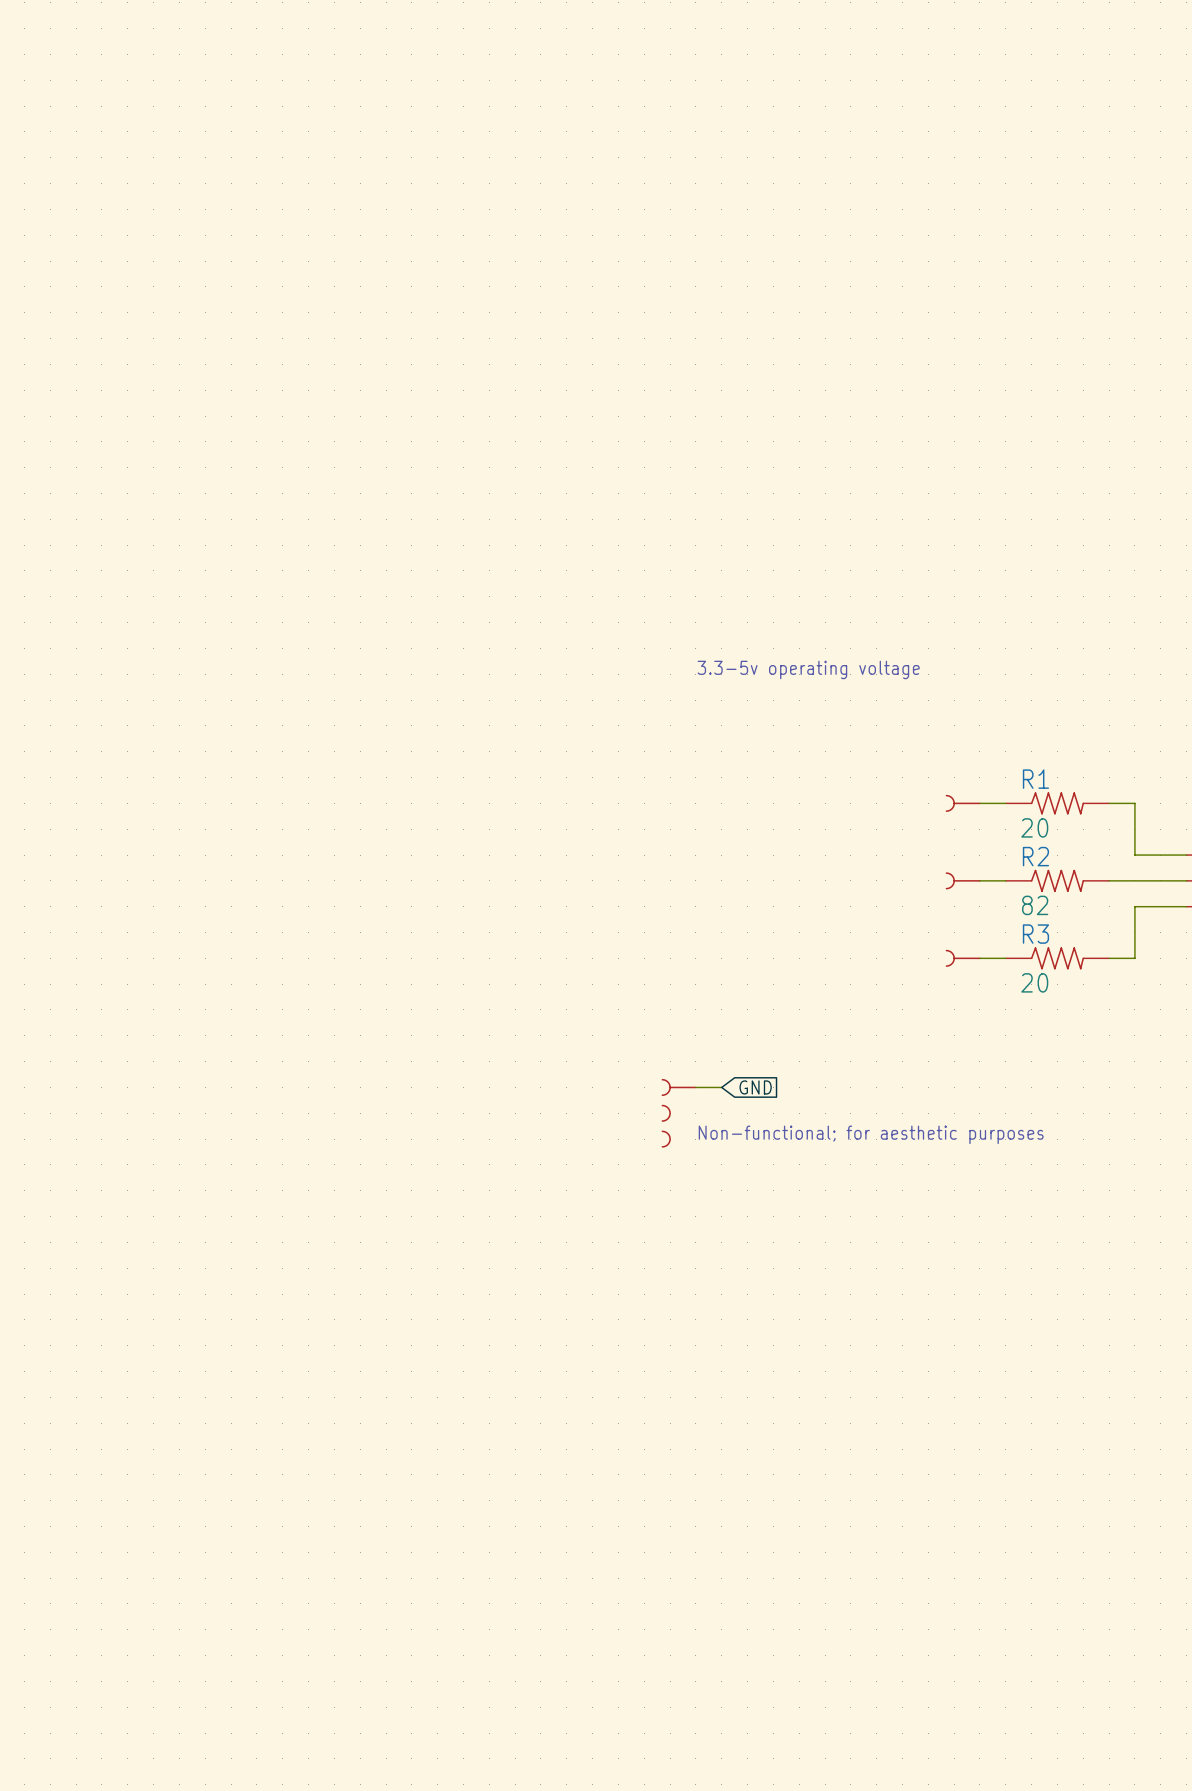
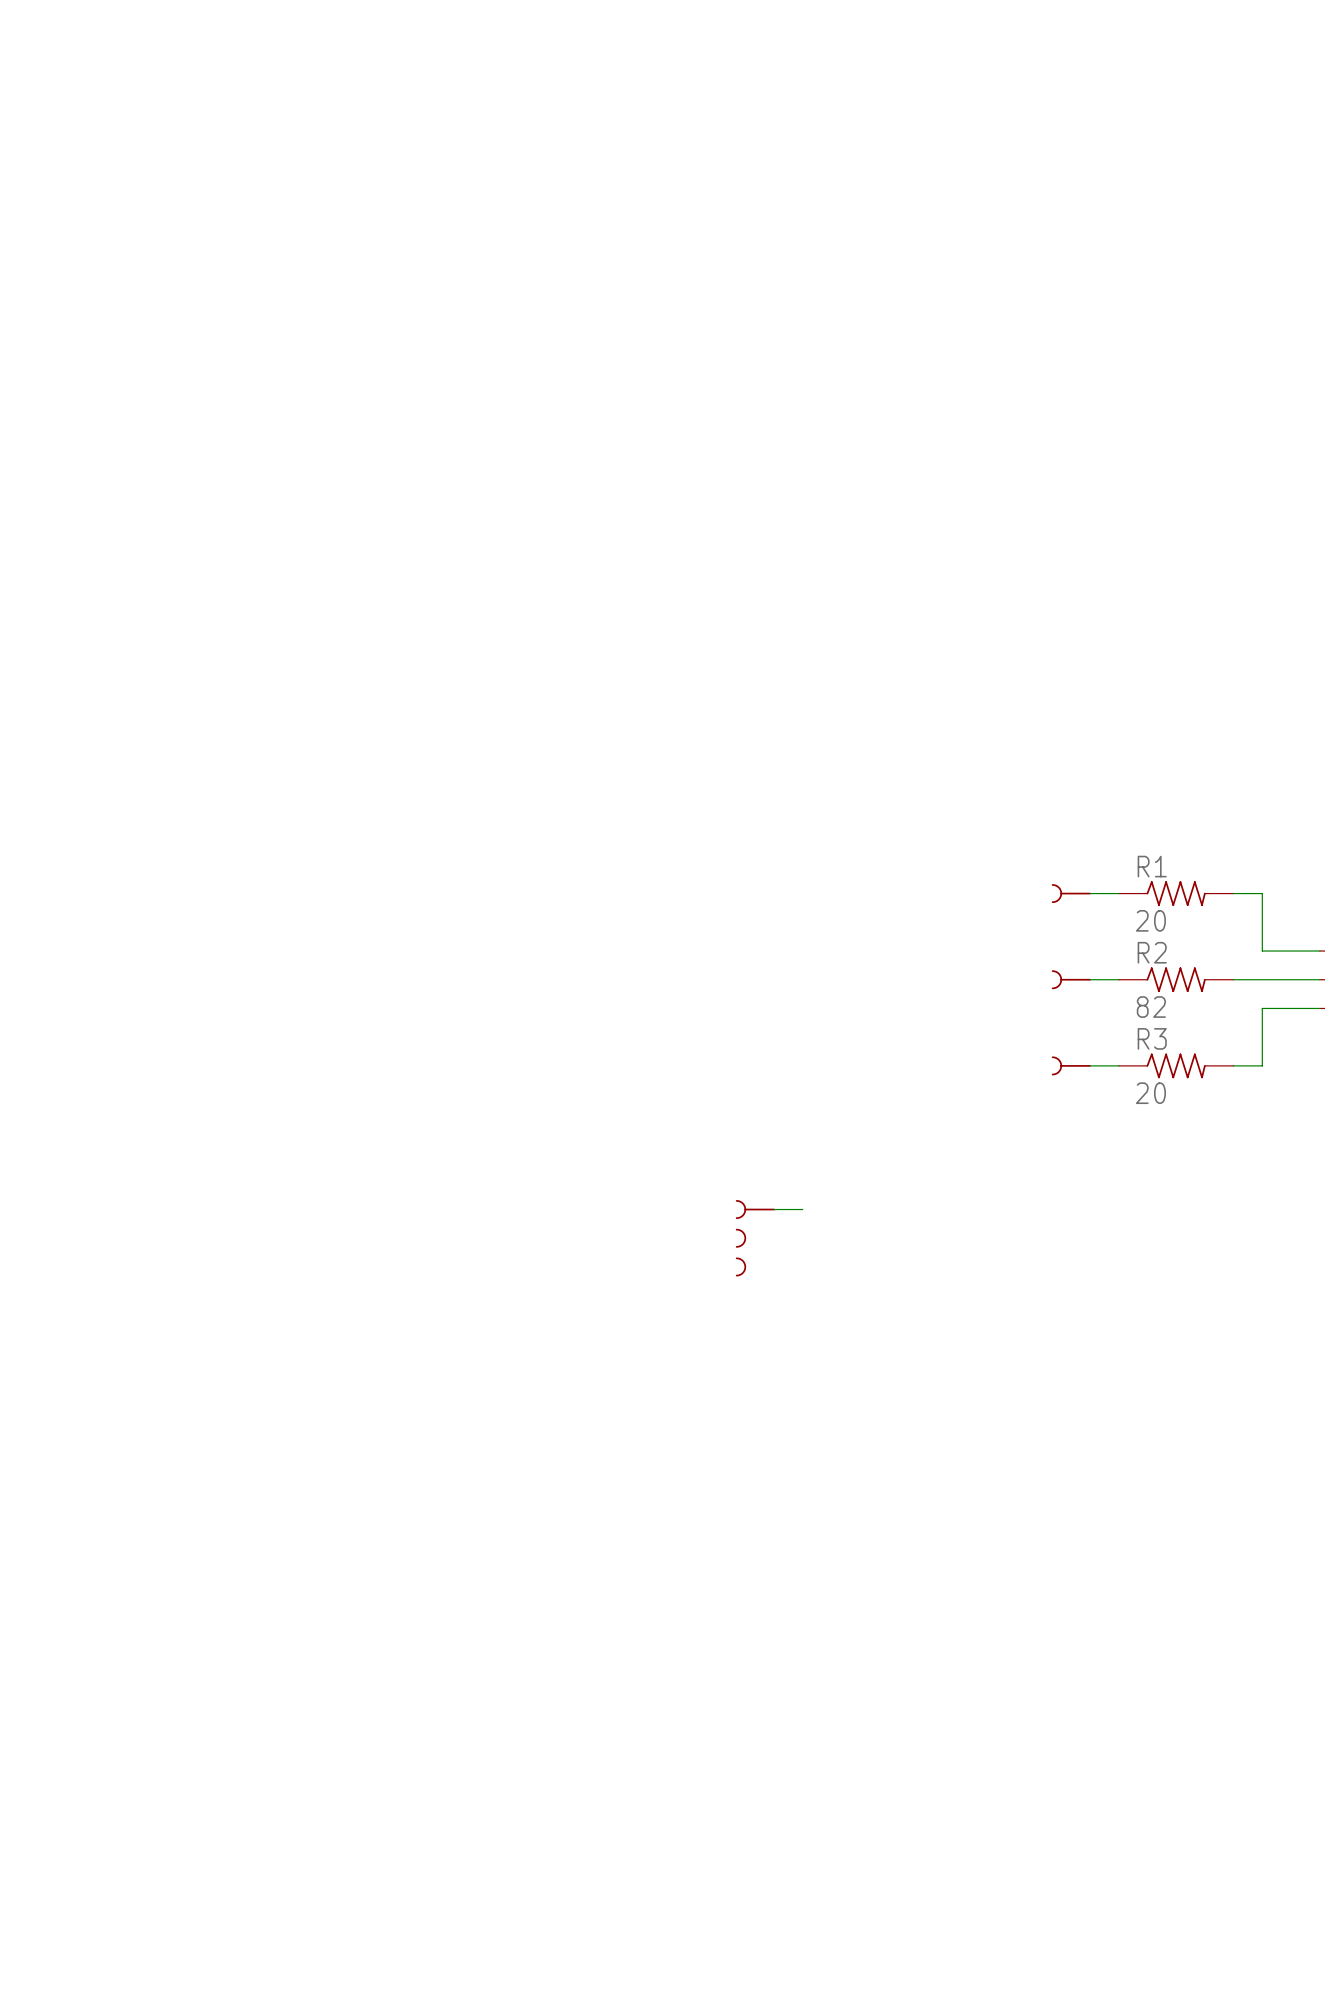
text: 3.3-5v operating voltage (808, 669) -> none
global label: GND (755, 1087) -> none
text: Non-functional; for aesthetic purposes (871, 1134) -> none

